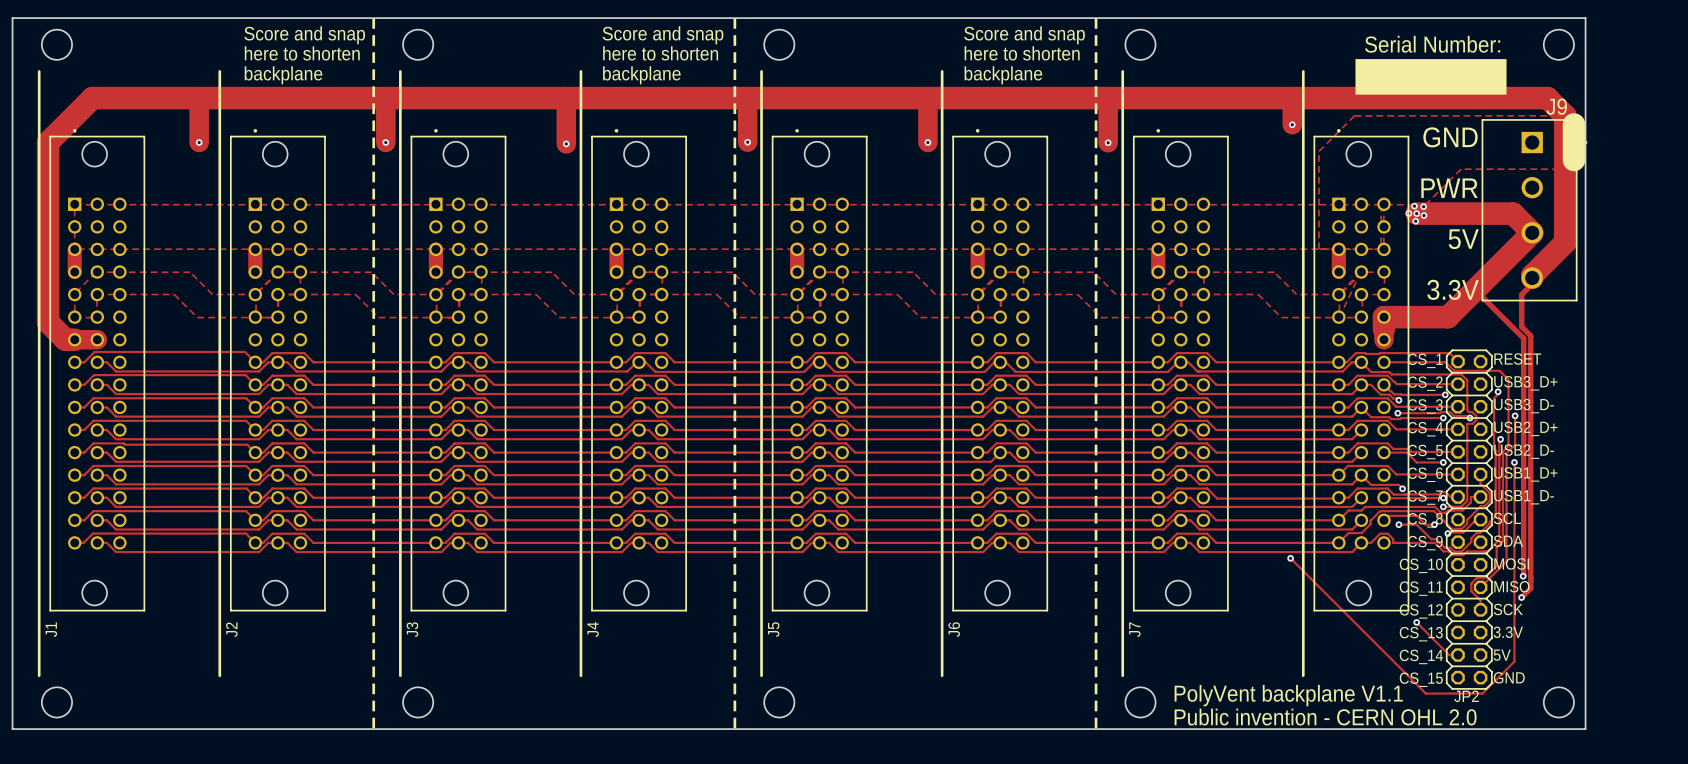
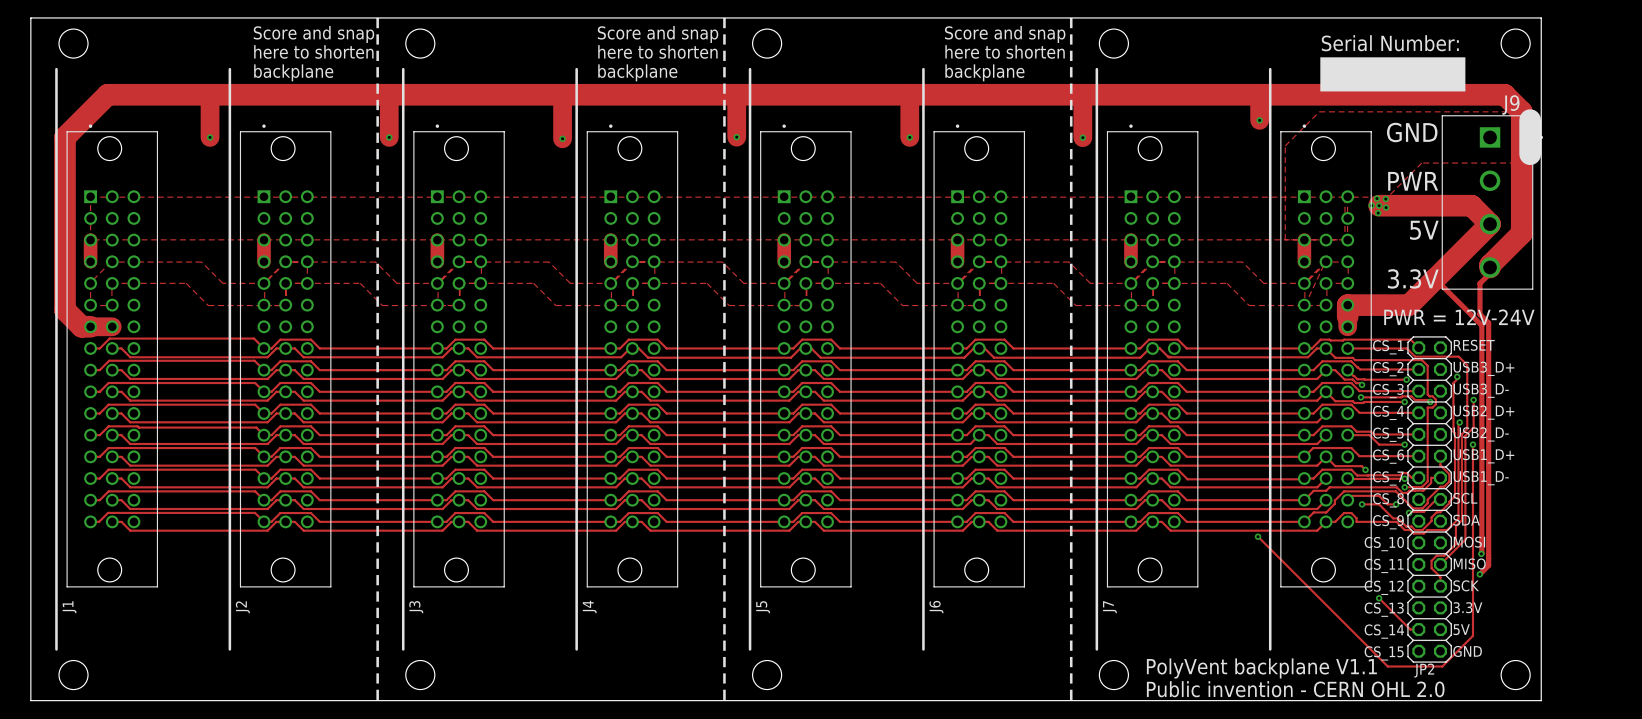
text: none -> PWR = 12V-24V (1459, 317)

